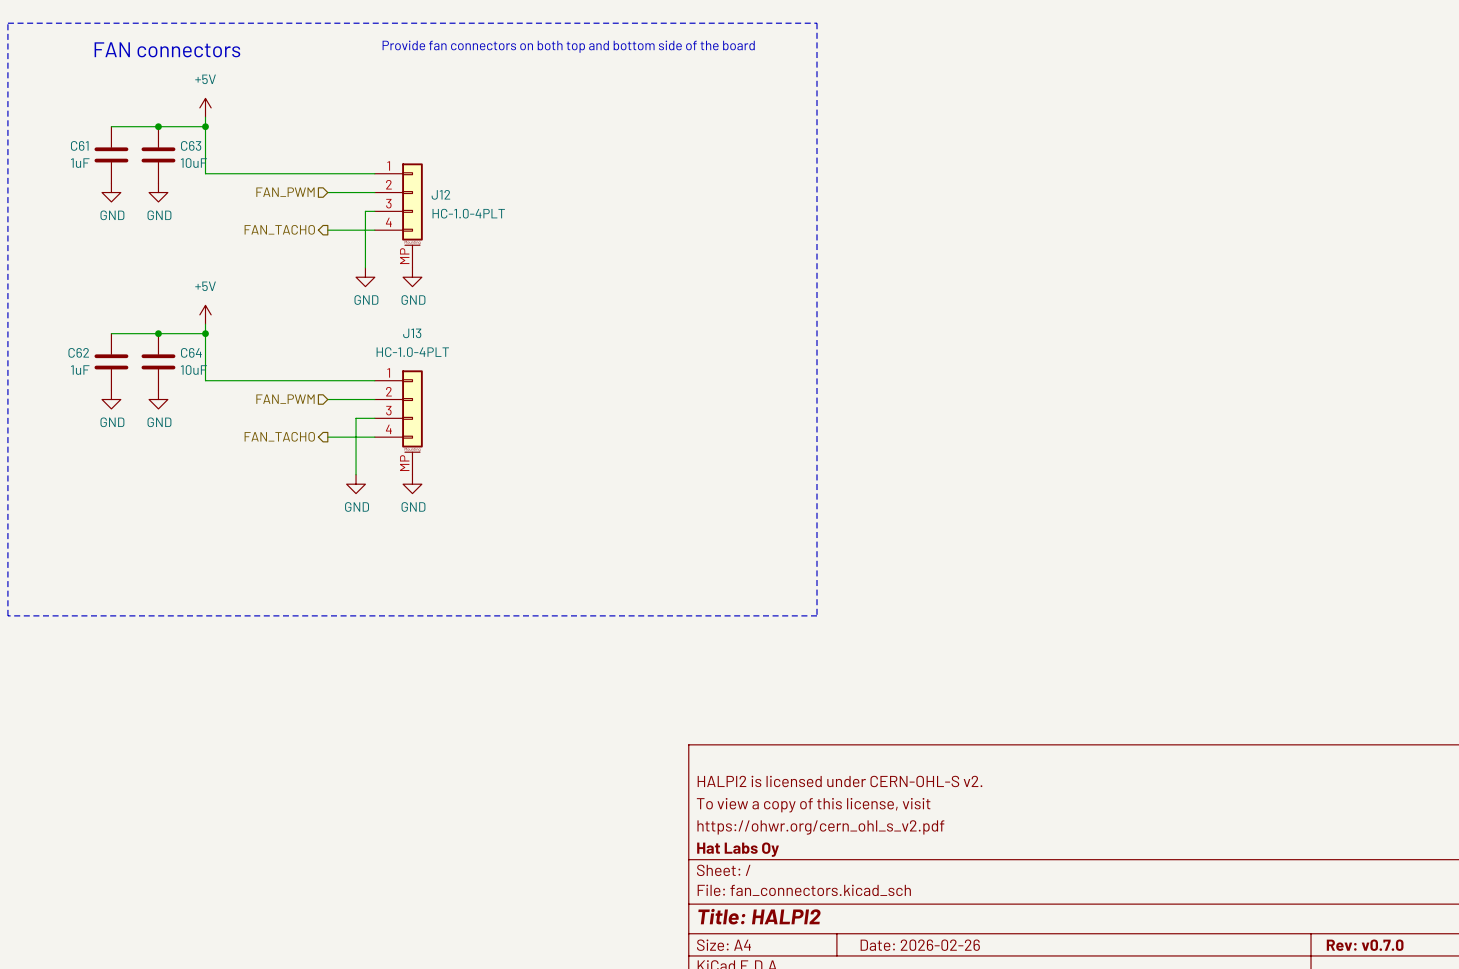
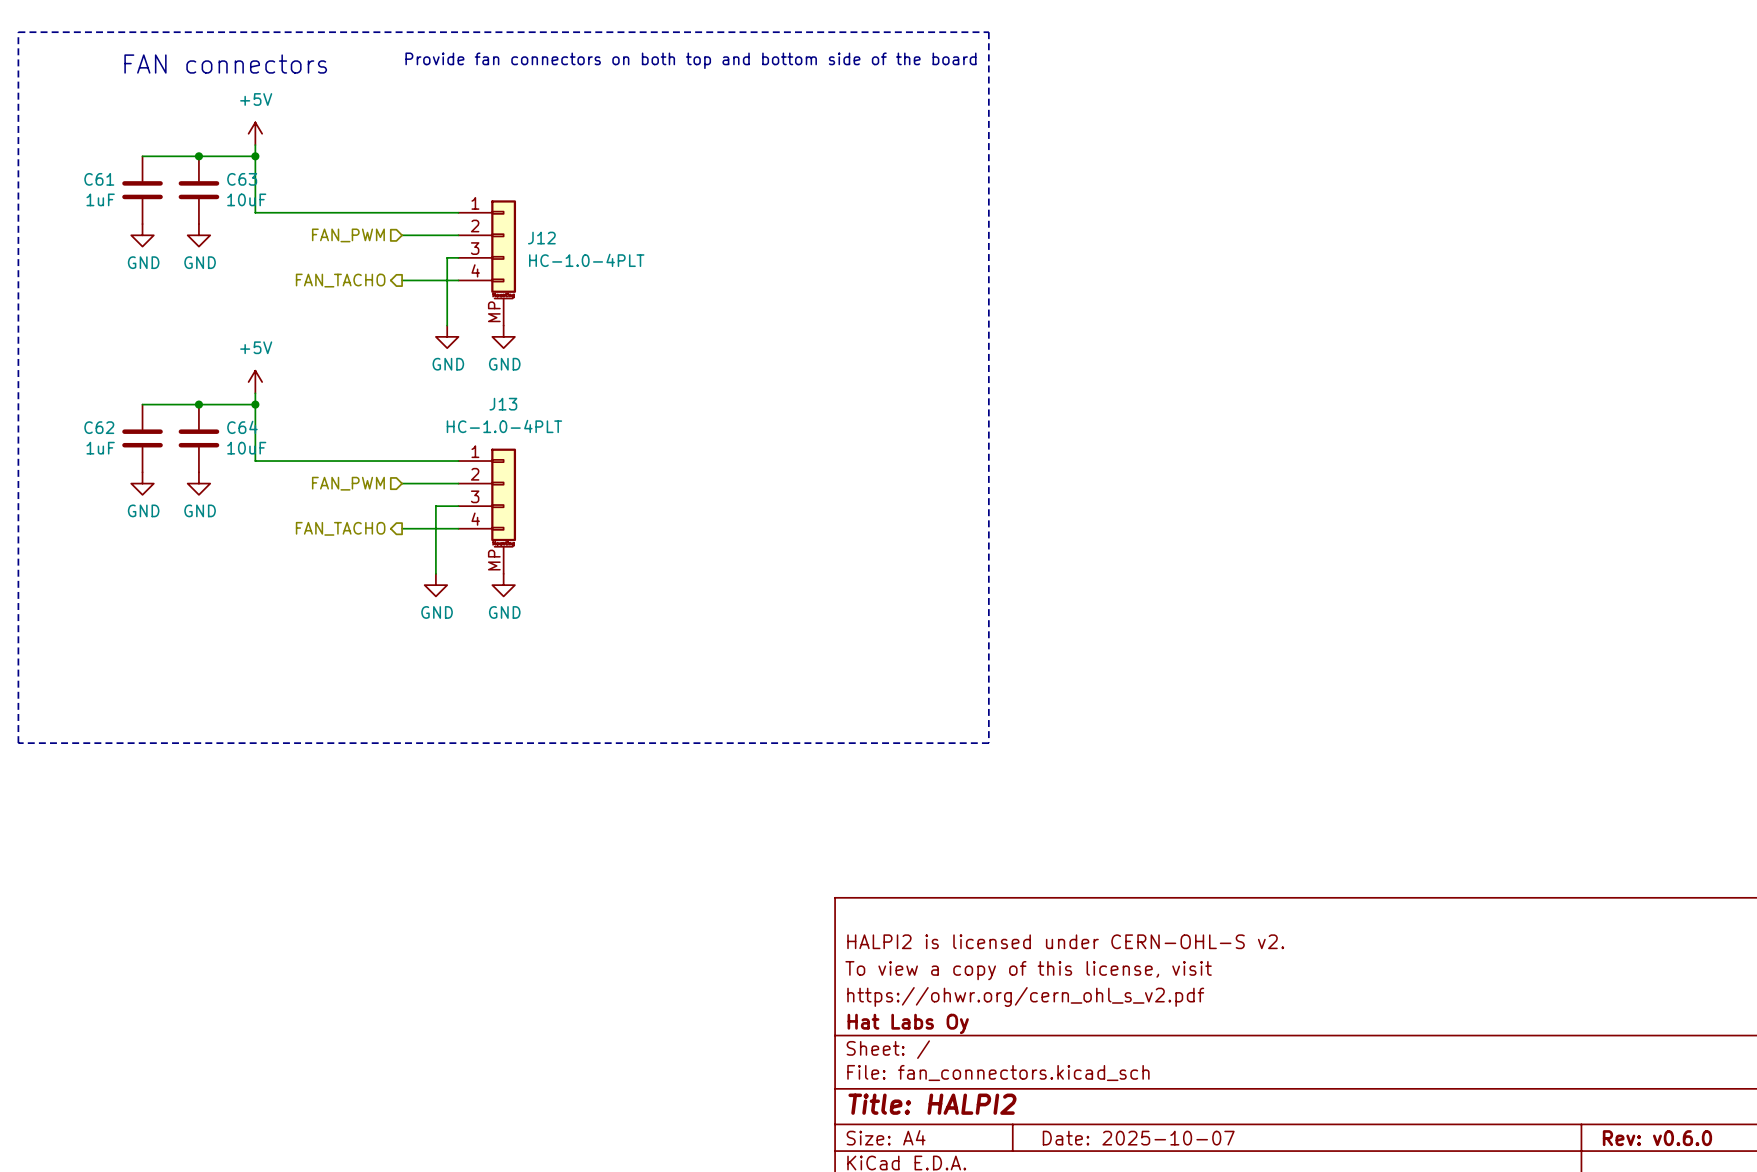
title block: Date: 2026-02-26 (920, 945) -> Date: 2025-10-07 (1138, 1138)
title block: Rev: v0.7.0 (1365, 945) -> Rev: v0.6.0 (1657, 1138)

